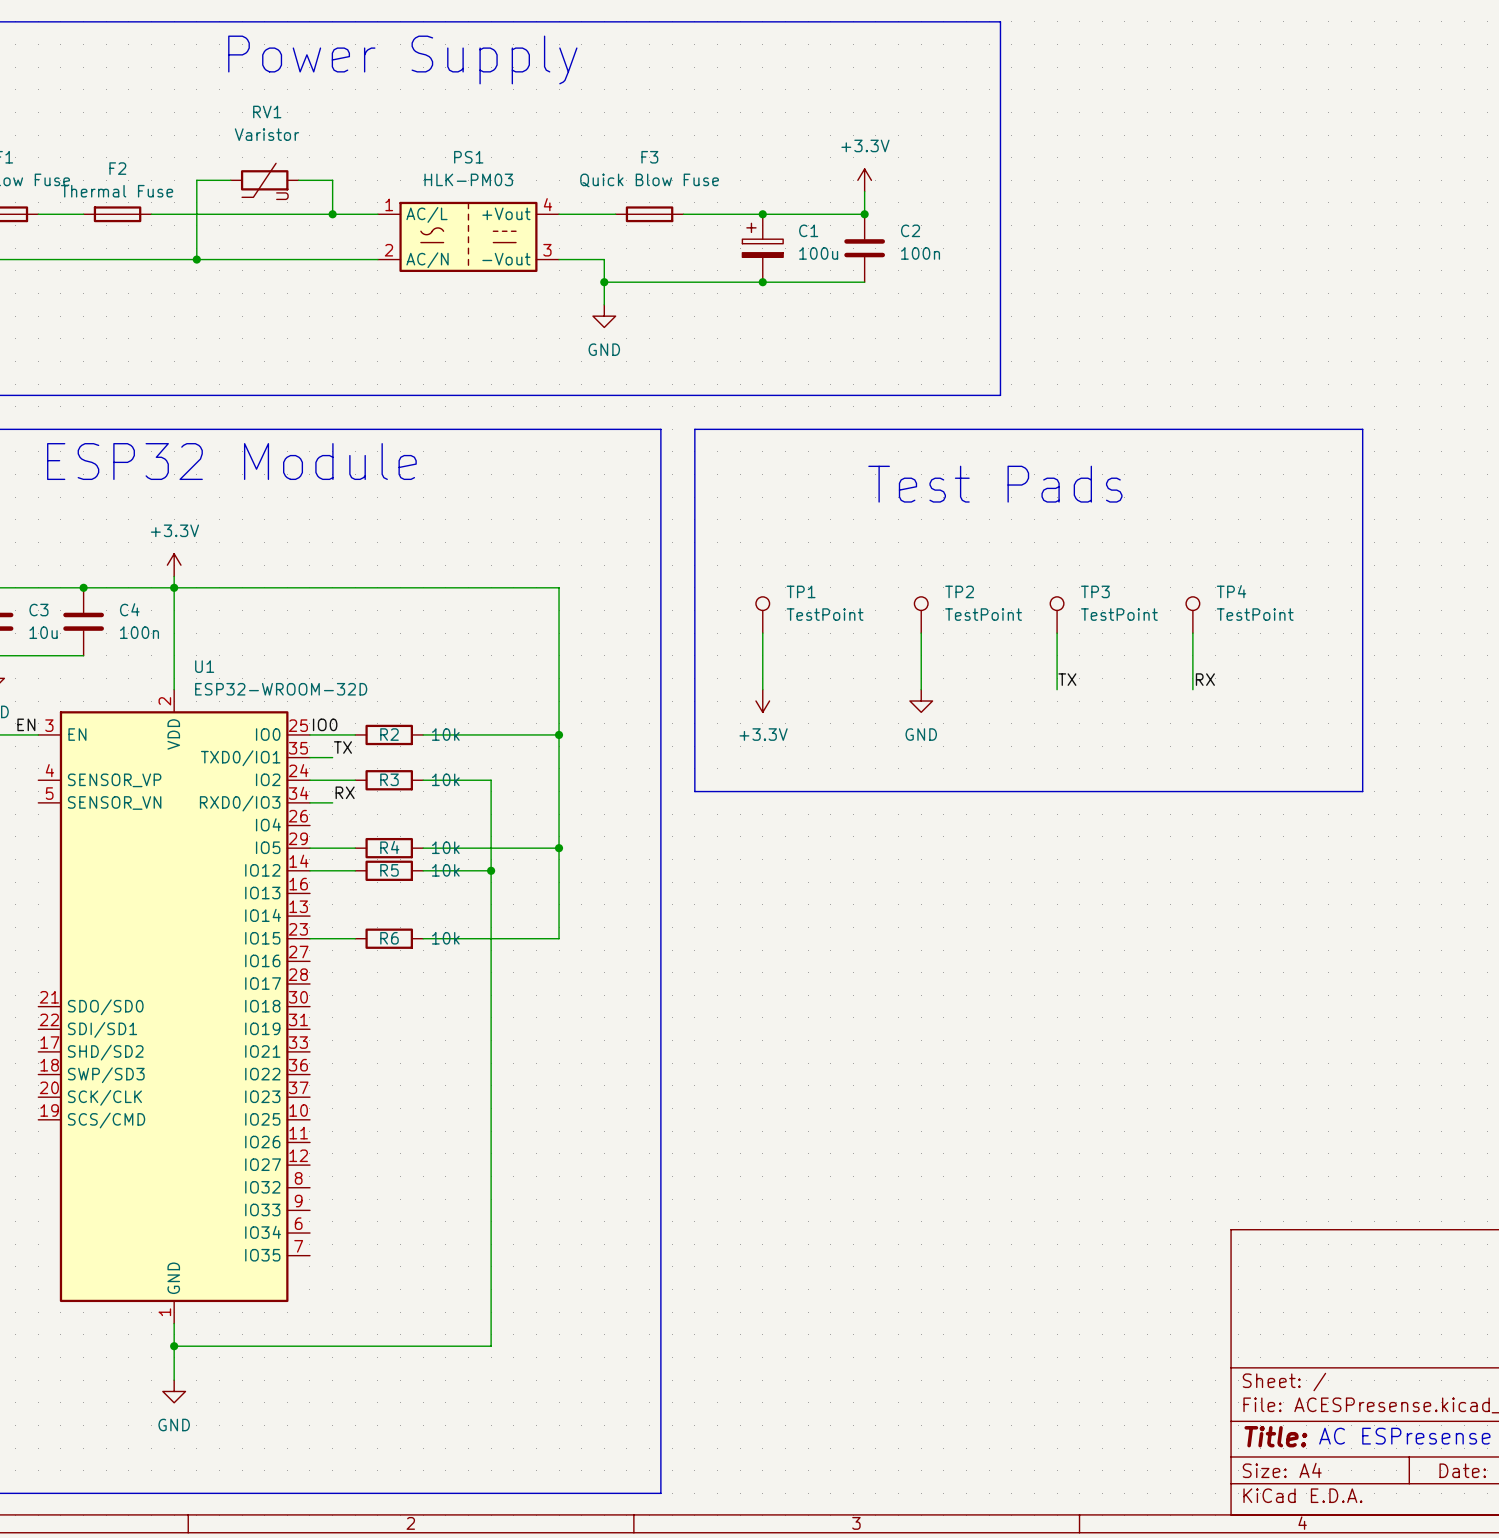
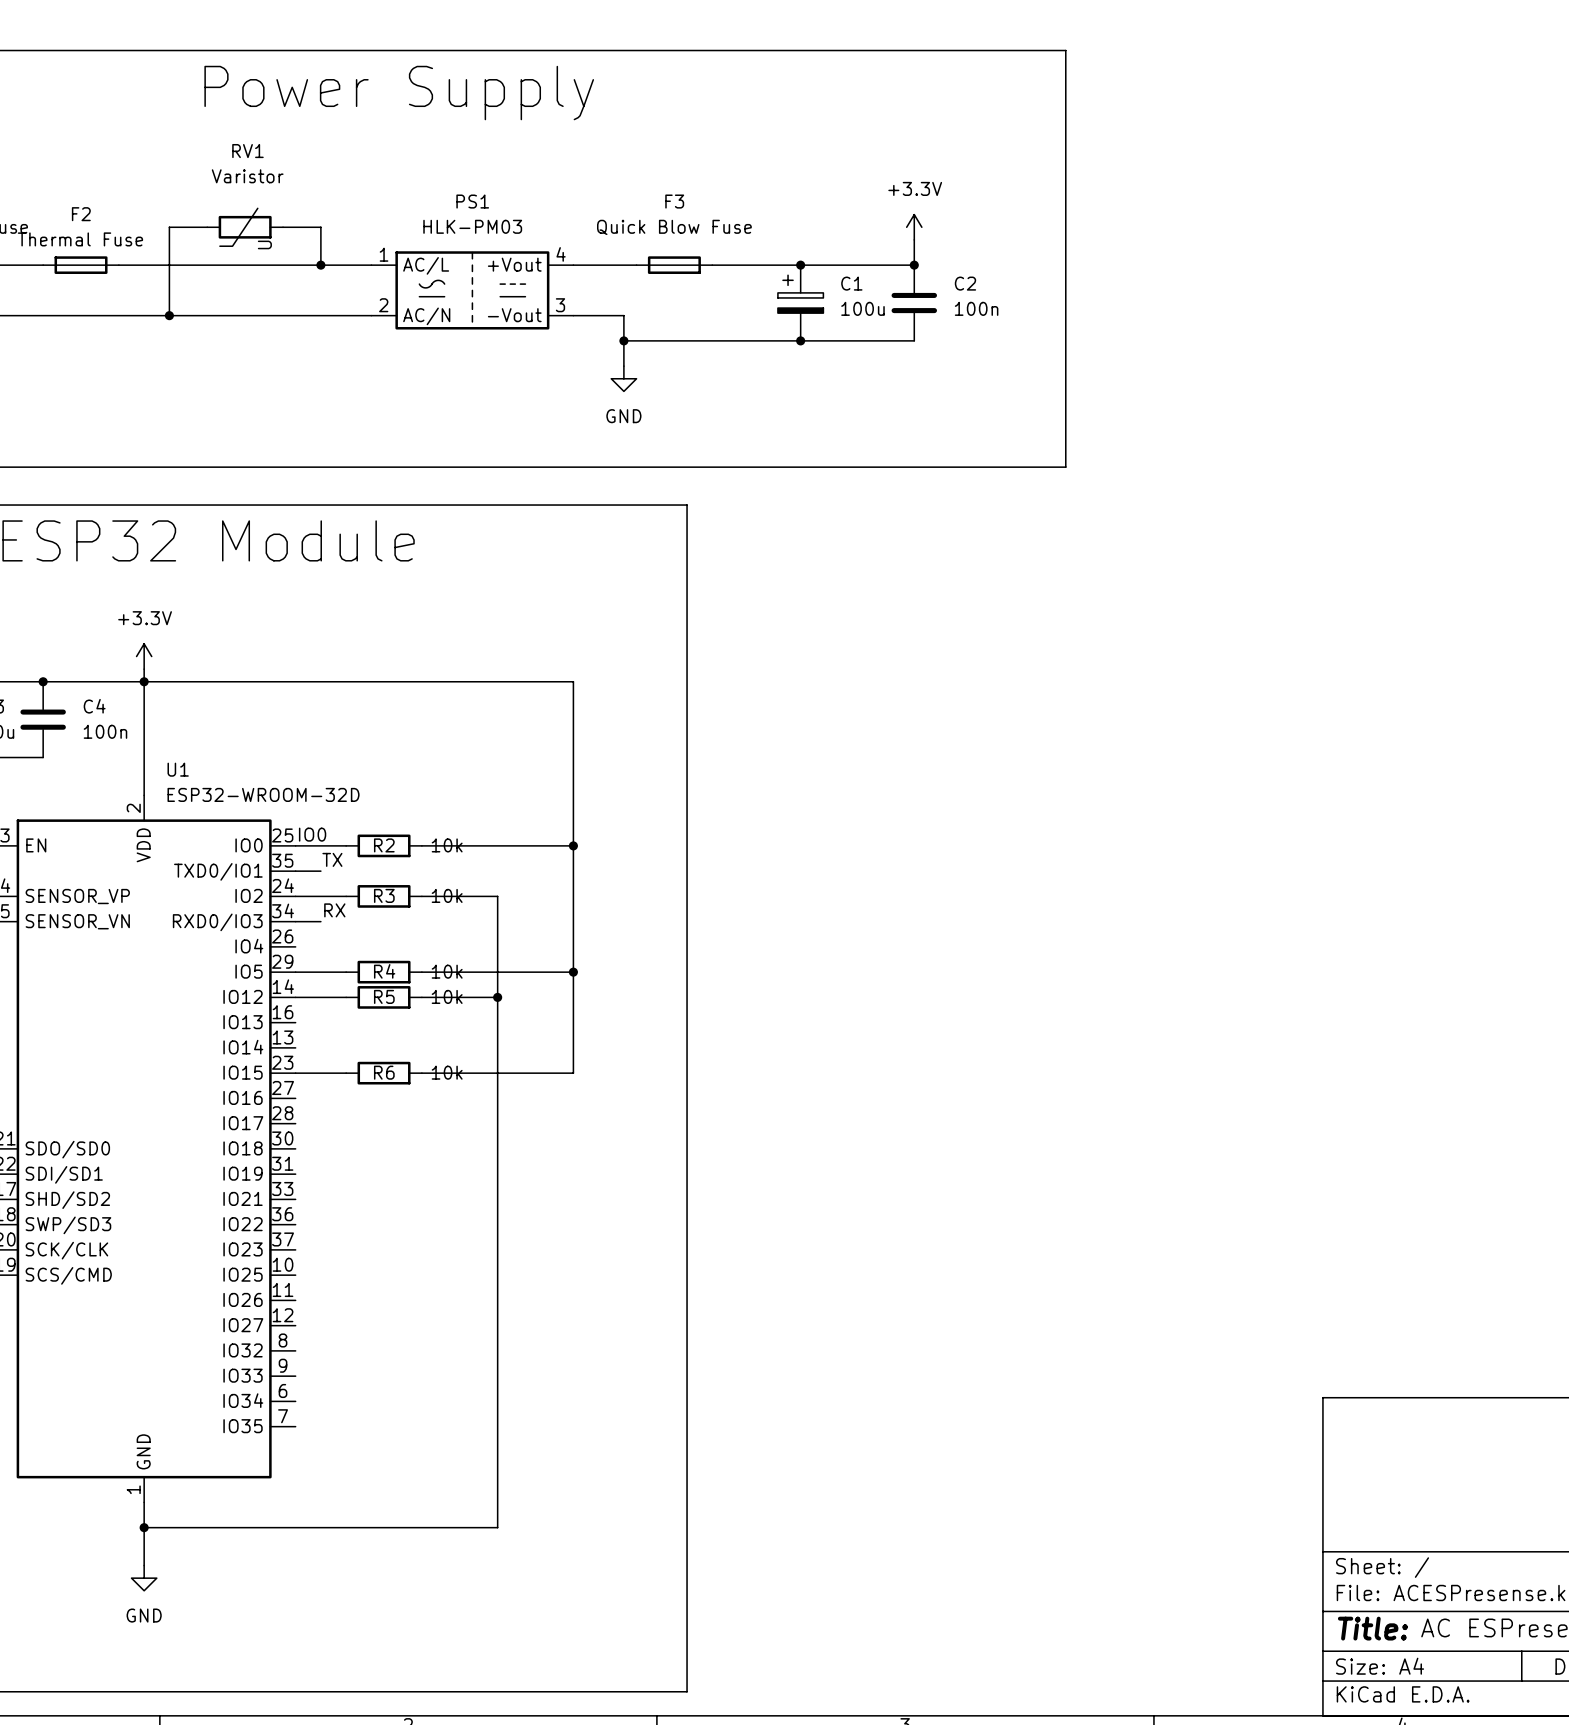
line: (694, 429) (1362, 429) (1362, 791) (694, 791) (694, 429) -> none
text: Test Pads (995, 484) -> none
TP1: TestPoint (762, 614) -> none
TP2: TestPoint (921, 614) -> none
TP3: TestPoint (1057, 614) -> none
TP4: TestPoint (1192, 614) -> none
wire: (762, 633) (762, 689) -> none
wire: (921, 633) (921, 689) -> none
wire: (1057, 633) (1057, 689) -> none
wire: (1192, 633) (1192, 689) -> none
label: TX (1067, 679) -> none
label: RX (1205, 679) -> none
power symbol: +3.3V (762, 701) -> none
power symbol: GND (921, 701) -> none

